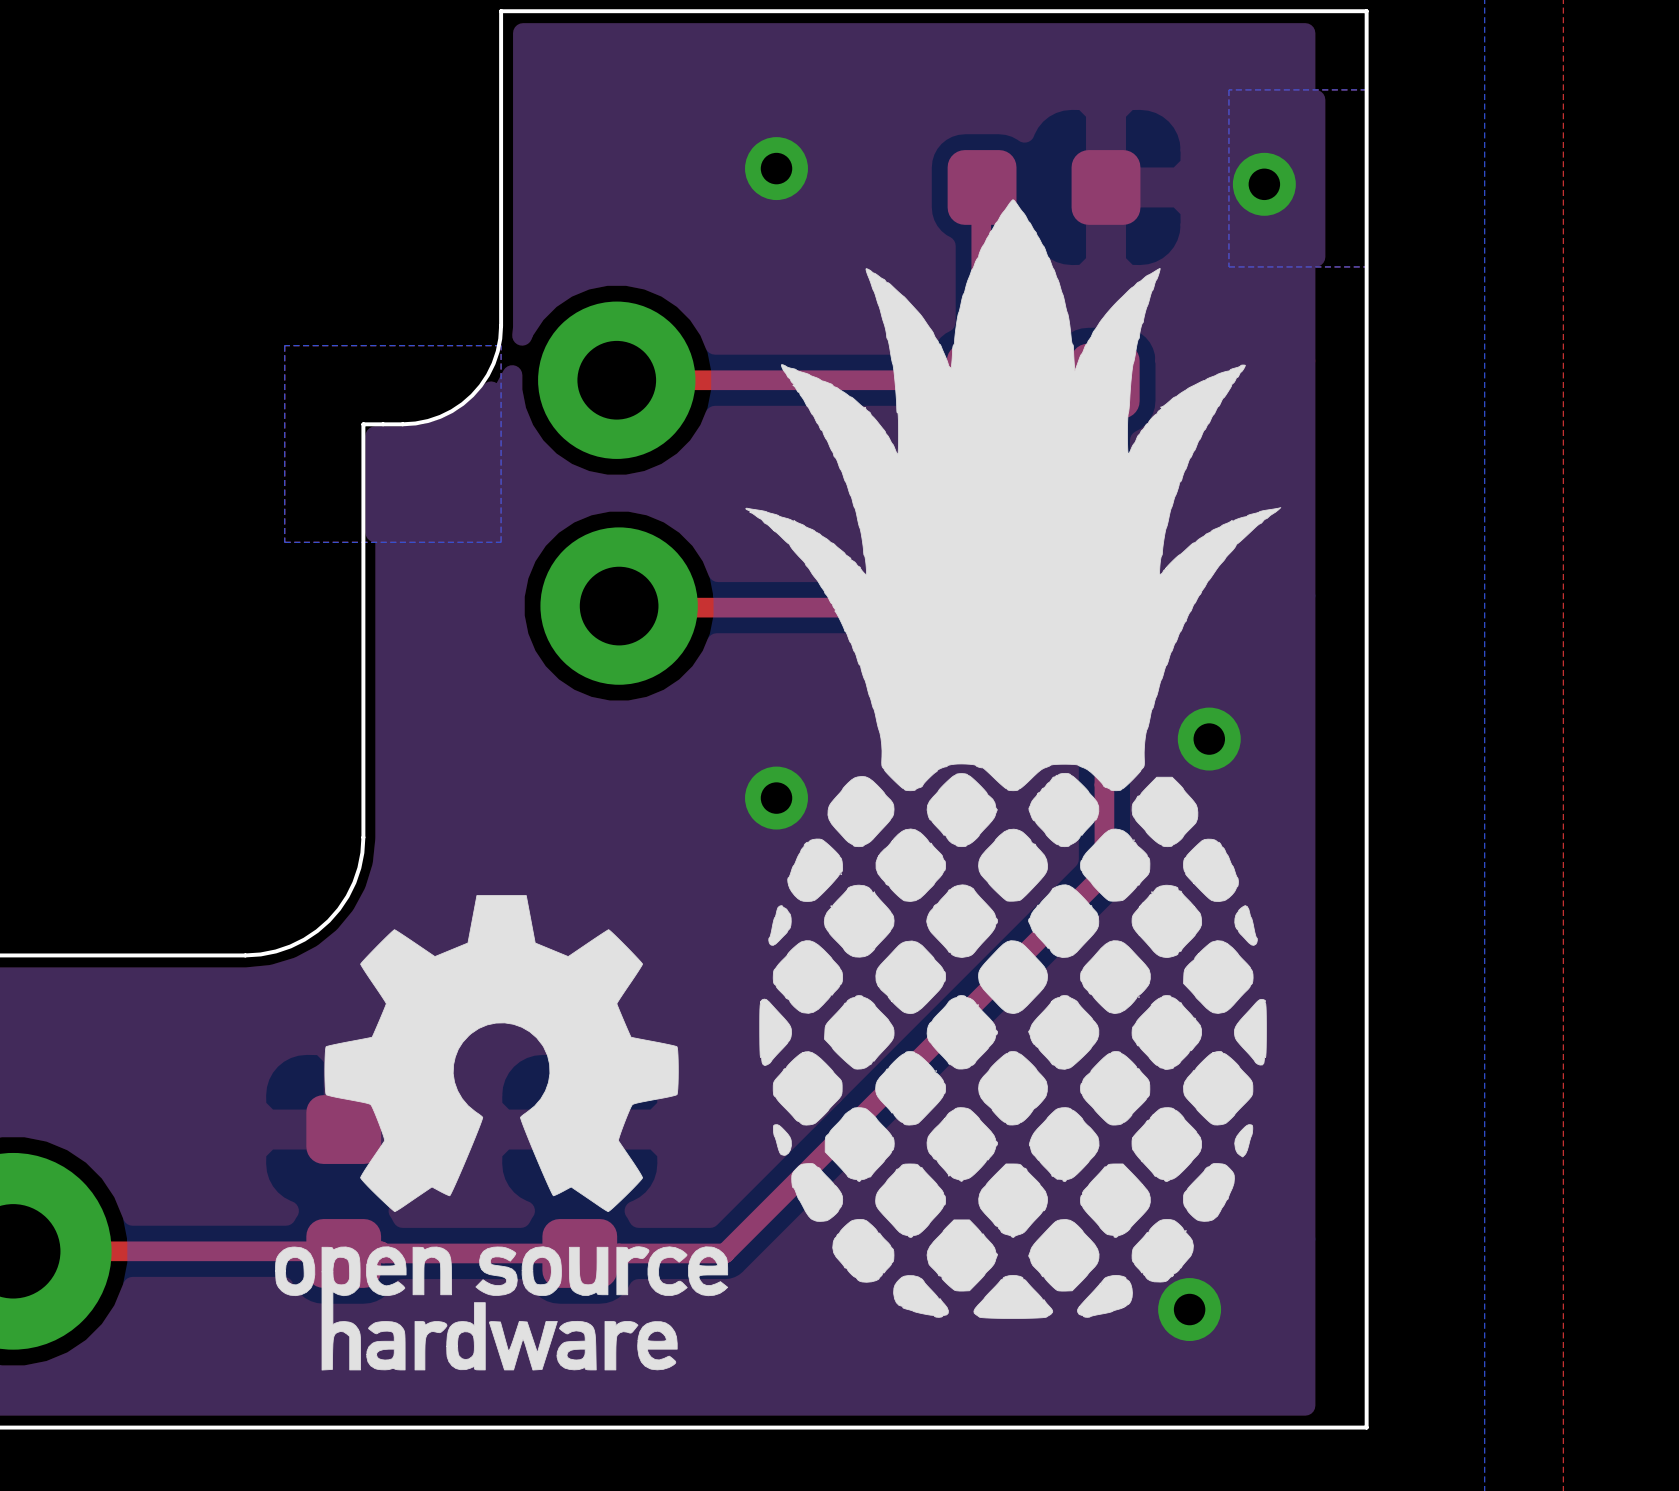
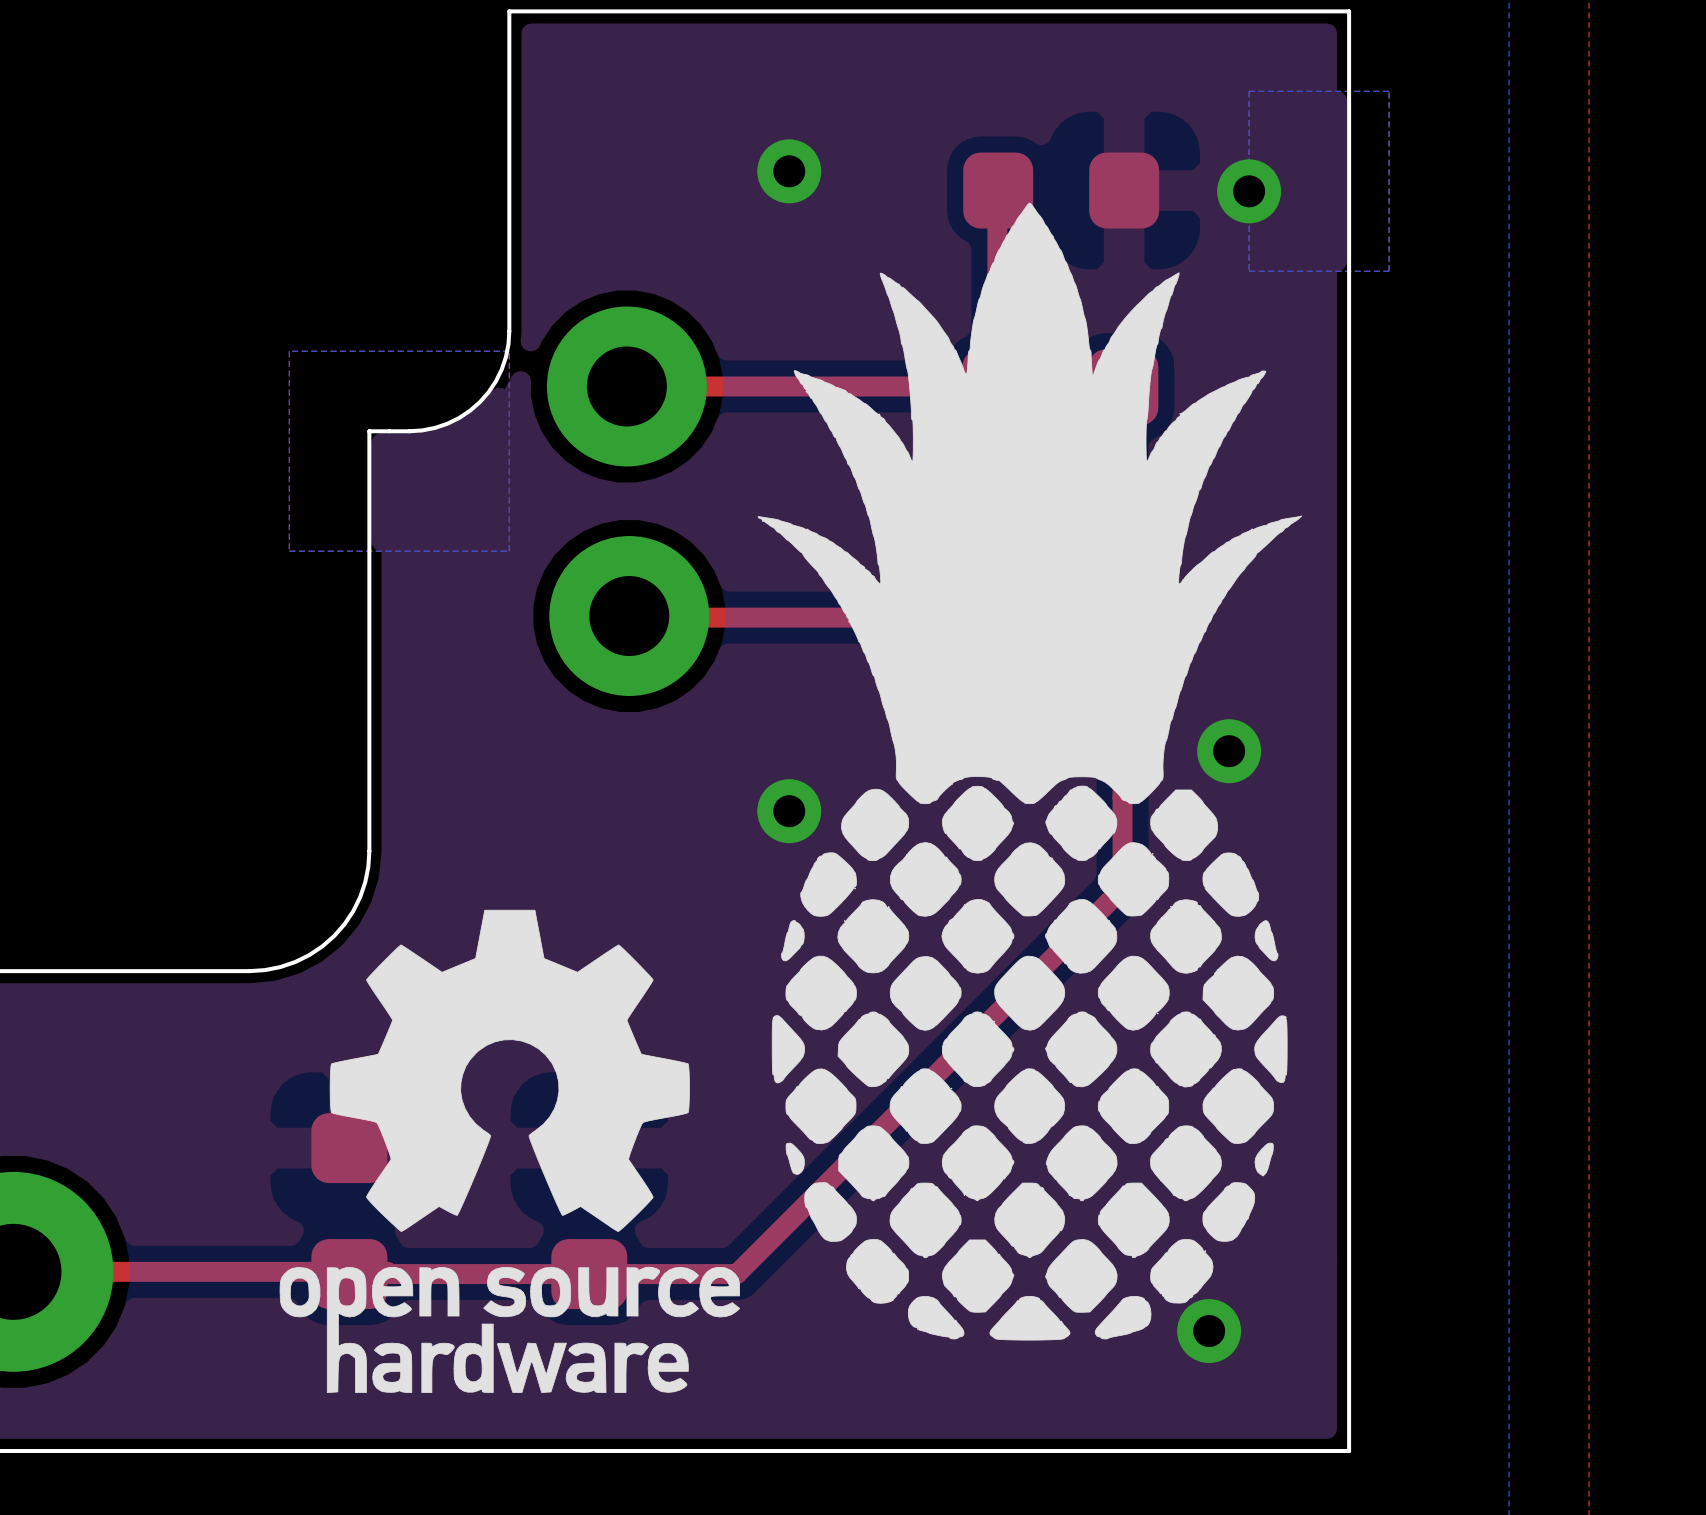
board edge: (1327, 11) (1366, 11) (1366, 1427) (1327, 1427) -> (1349, 11) (1349, 1451)
via position: (1264, 184) -> (1249, 191)

